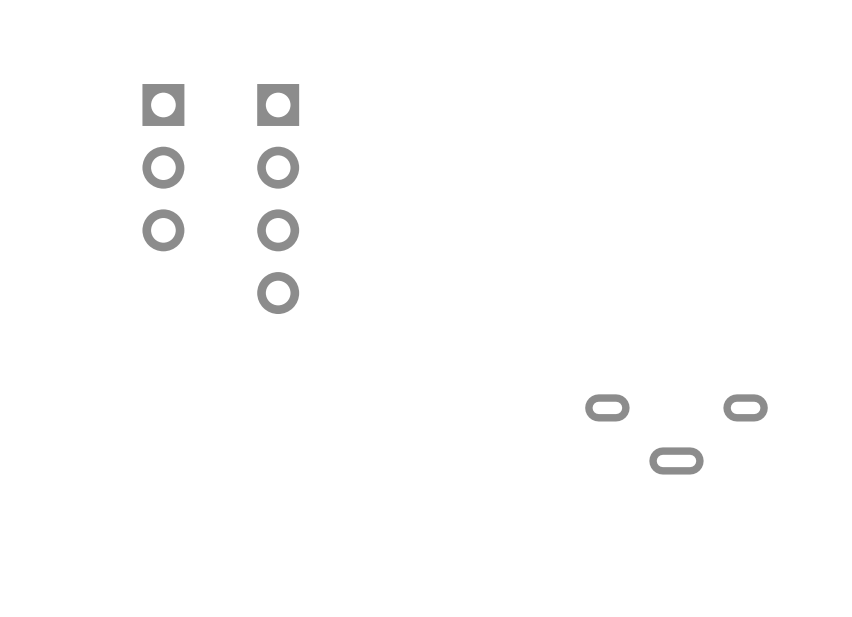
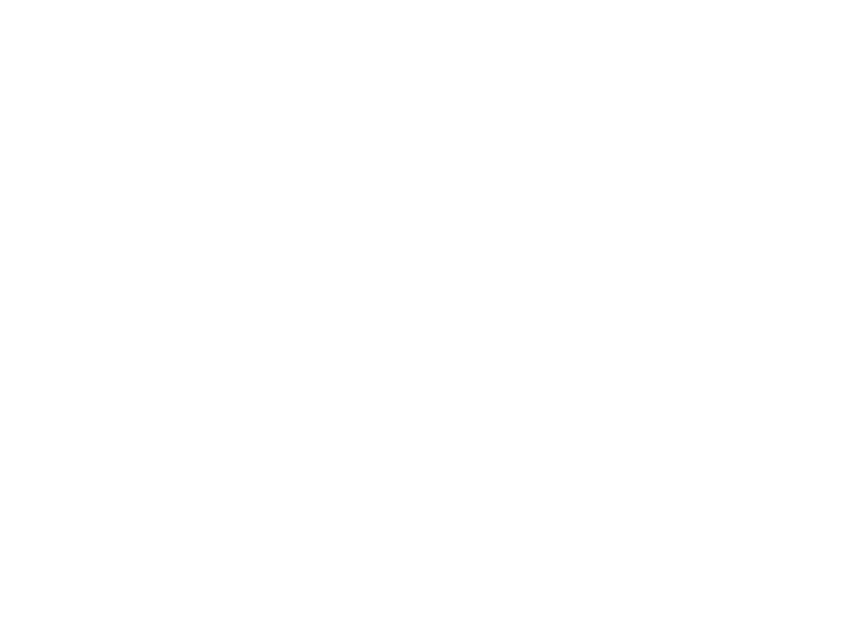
part: (163, 167) -> none
part: (278, 199) -> none
part: (676, 434) -> none

